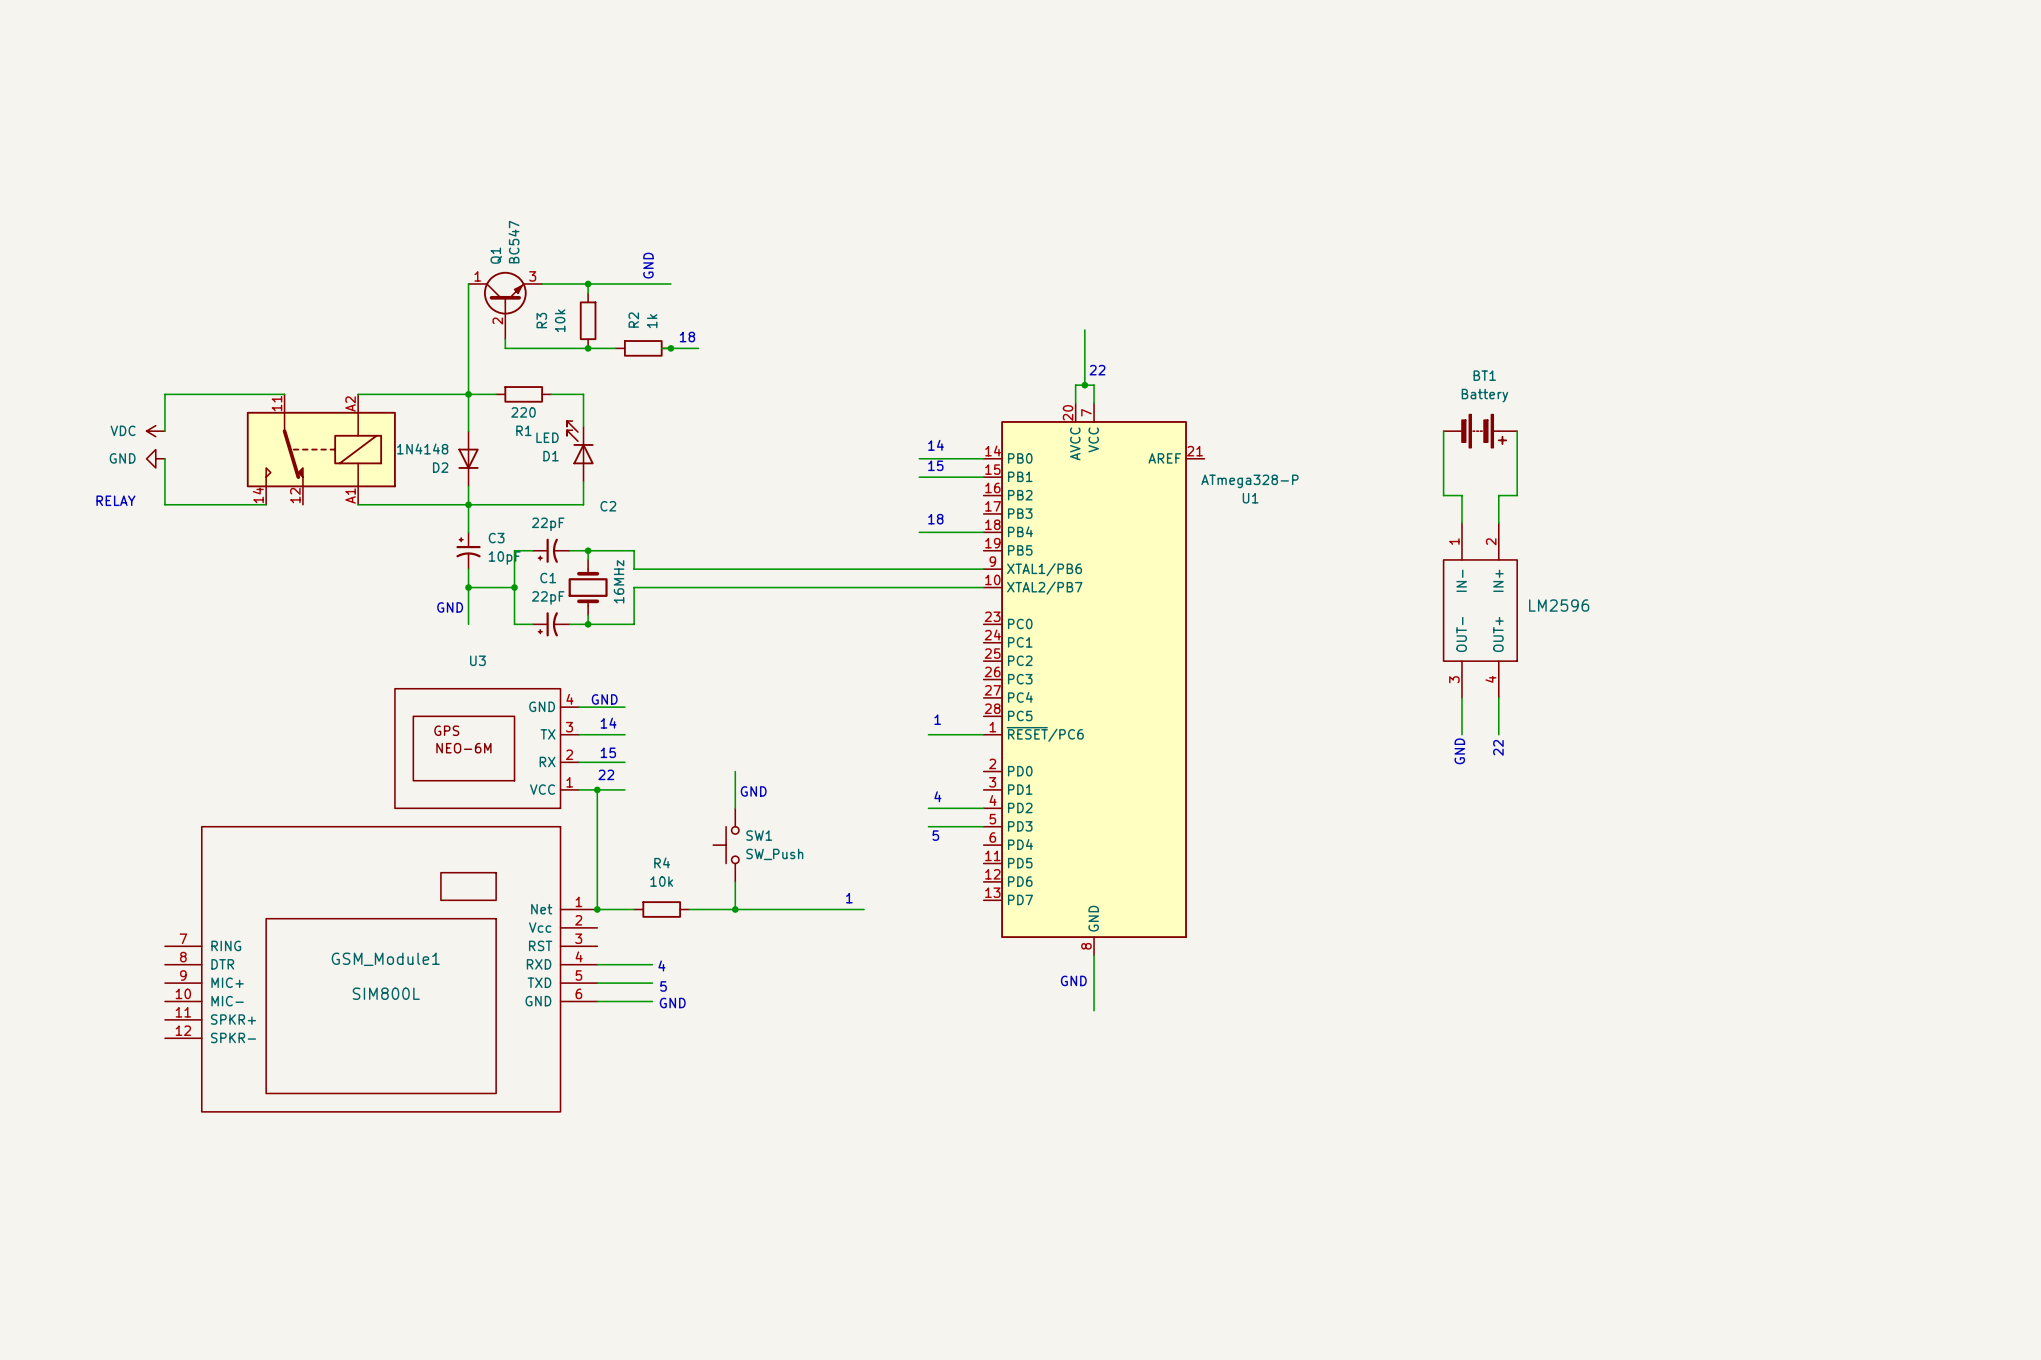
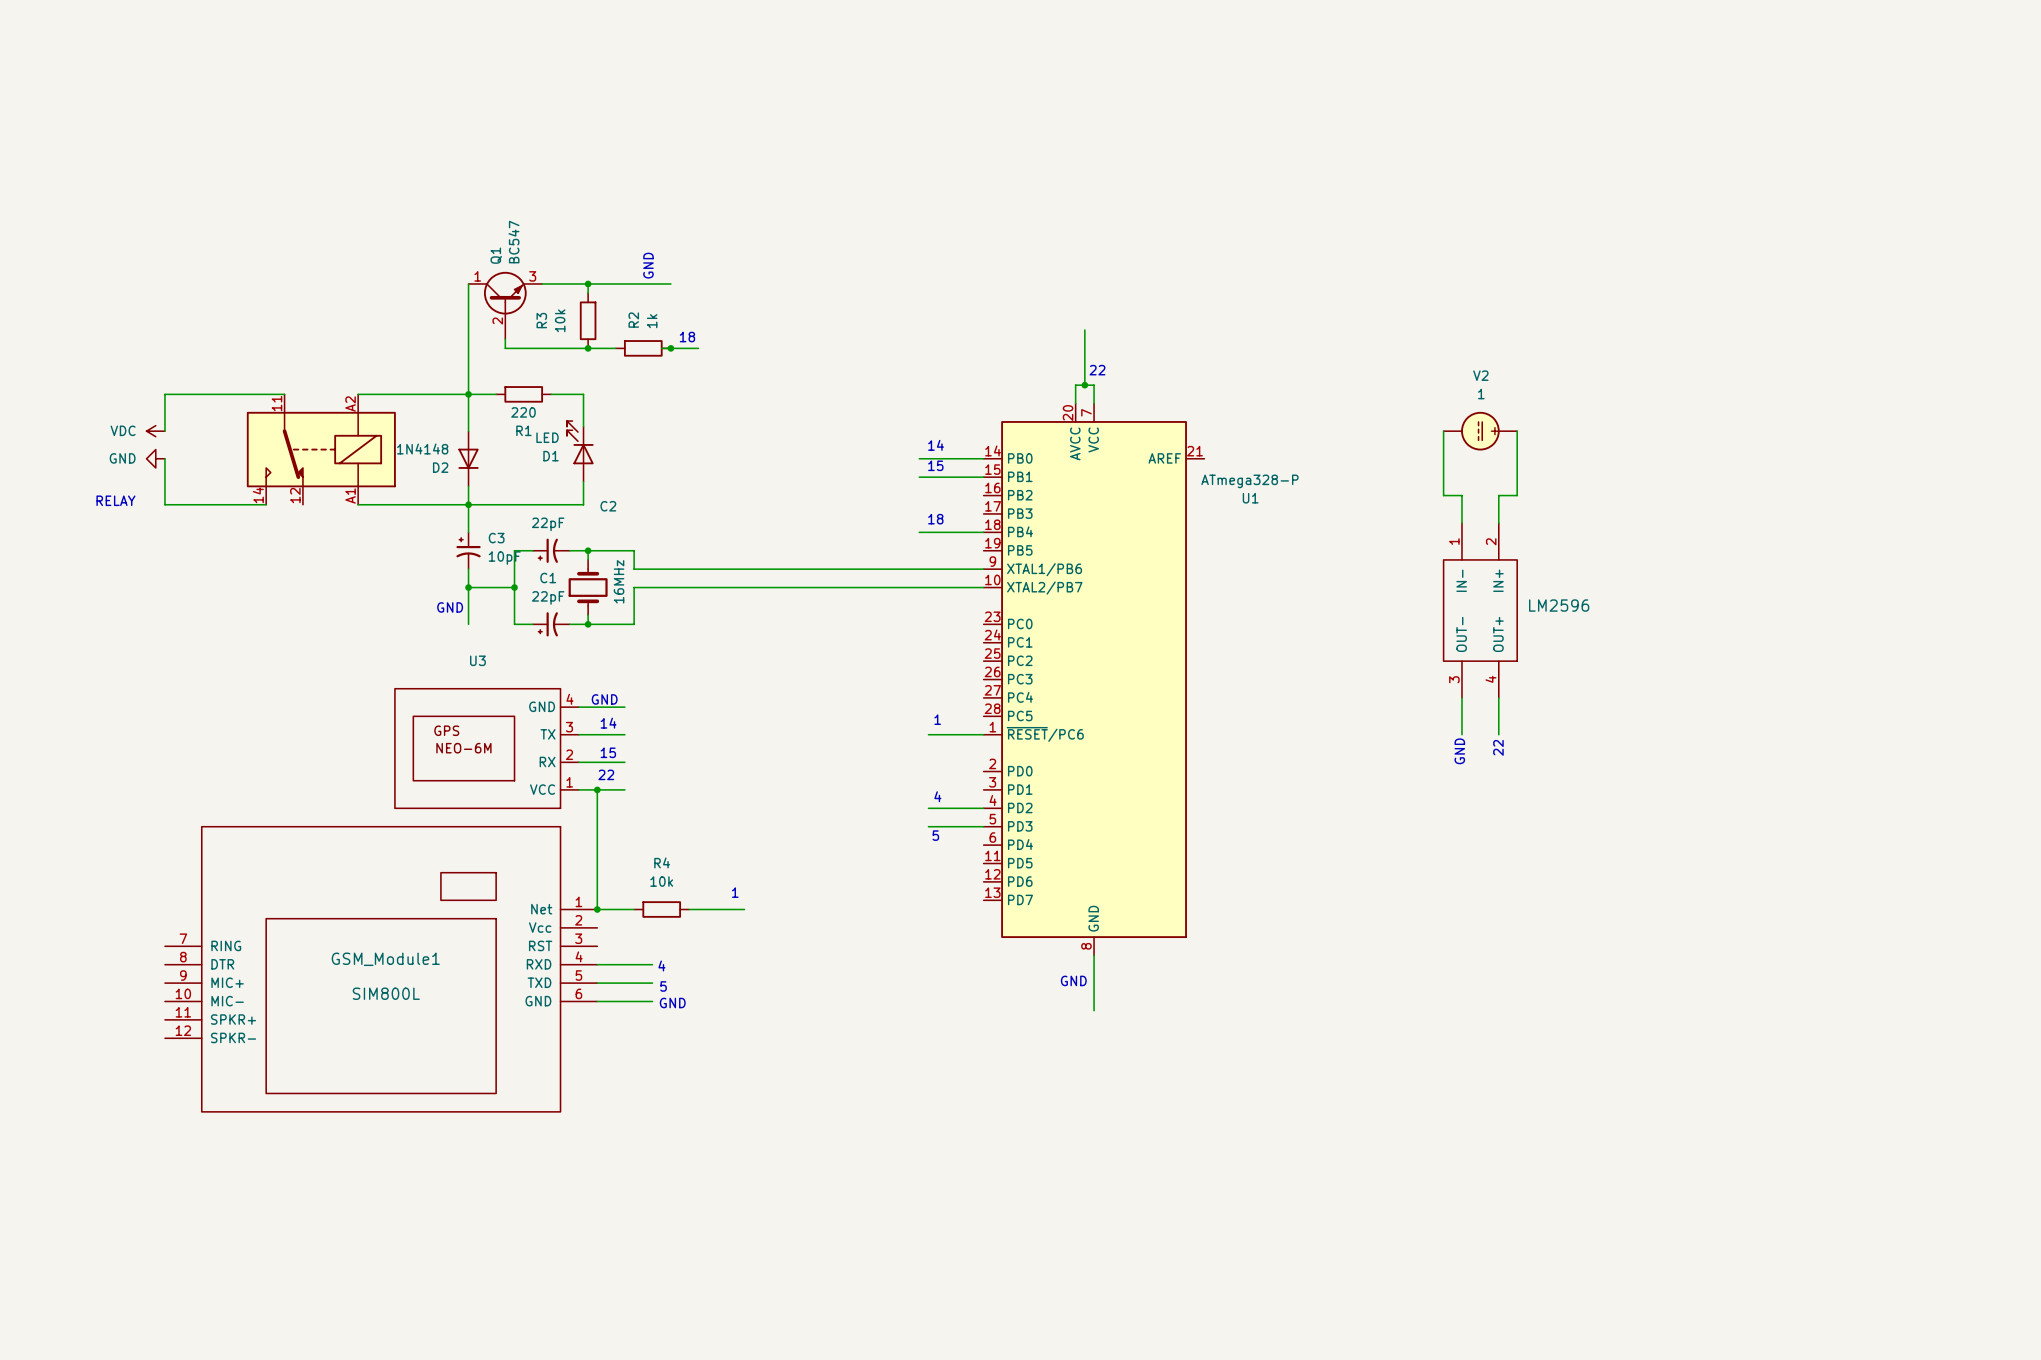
BT1: Battery (1480, 431) -> none
V2: none -> 1 (1480, 431)
wire: (735, 771) (735, 808) -> none
text: GND (753, 791) -> none
SW1: SW_Push (726, 845) -> none
wire: (735, 881) (735, 909) -> none
text position: 1 (849, 898) -> 1 (735, 892)
junction: (735, 909) -> none
wire: (744, 909) (864, 909) -> none

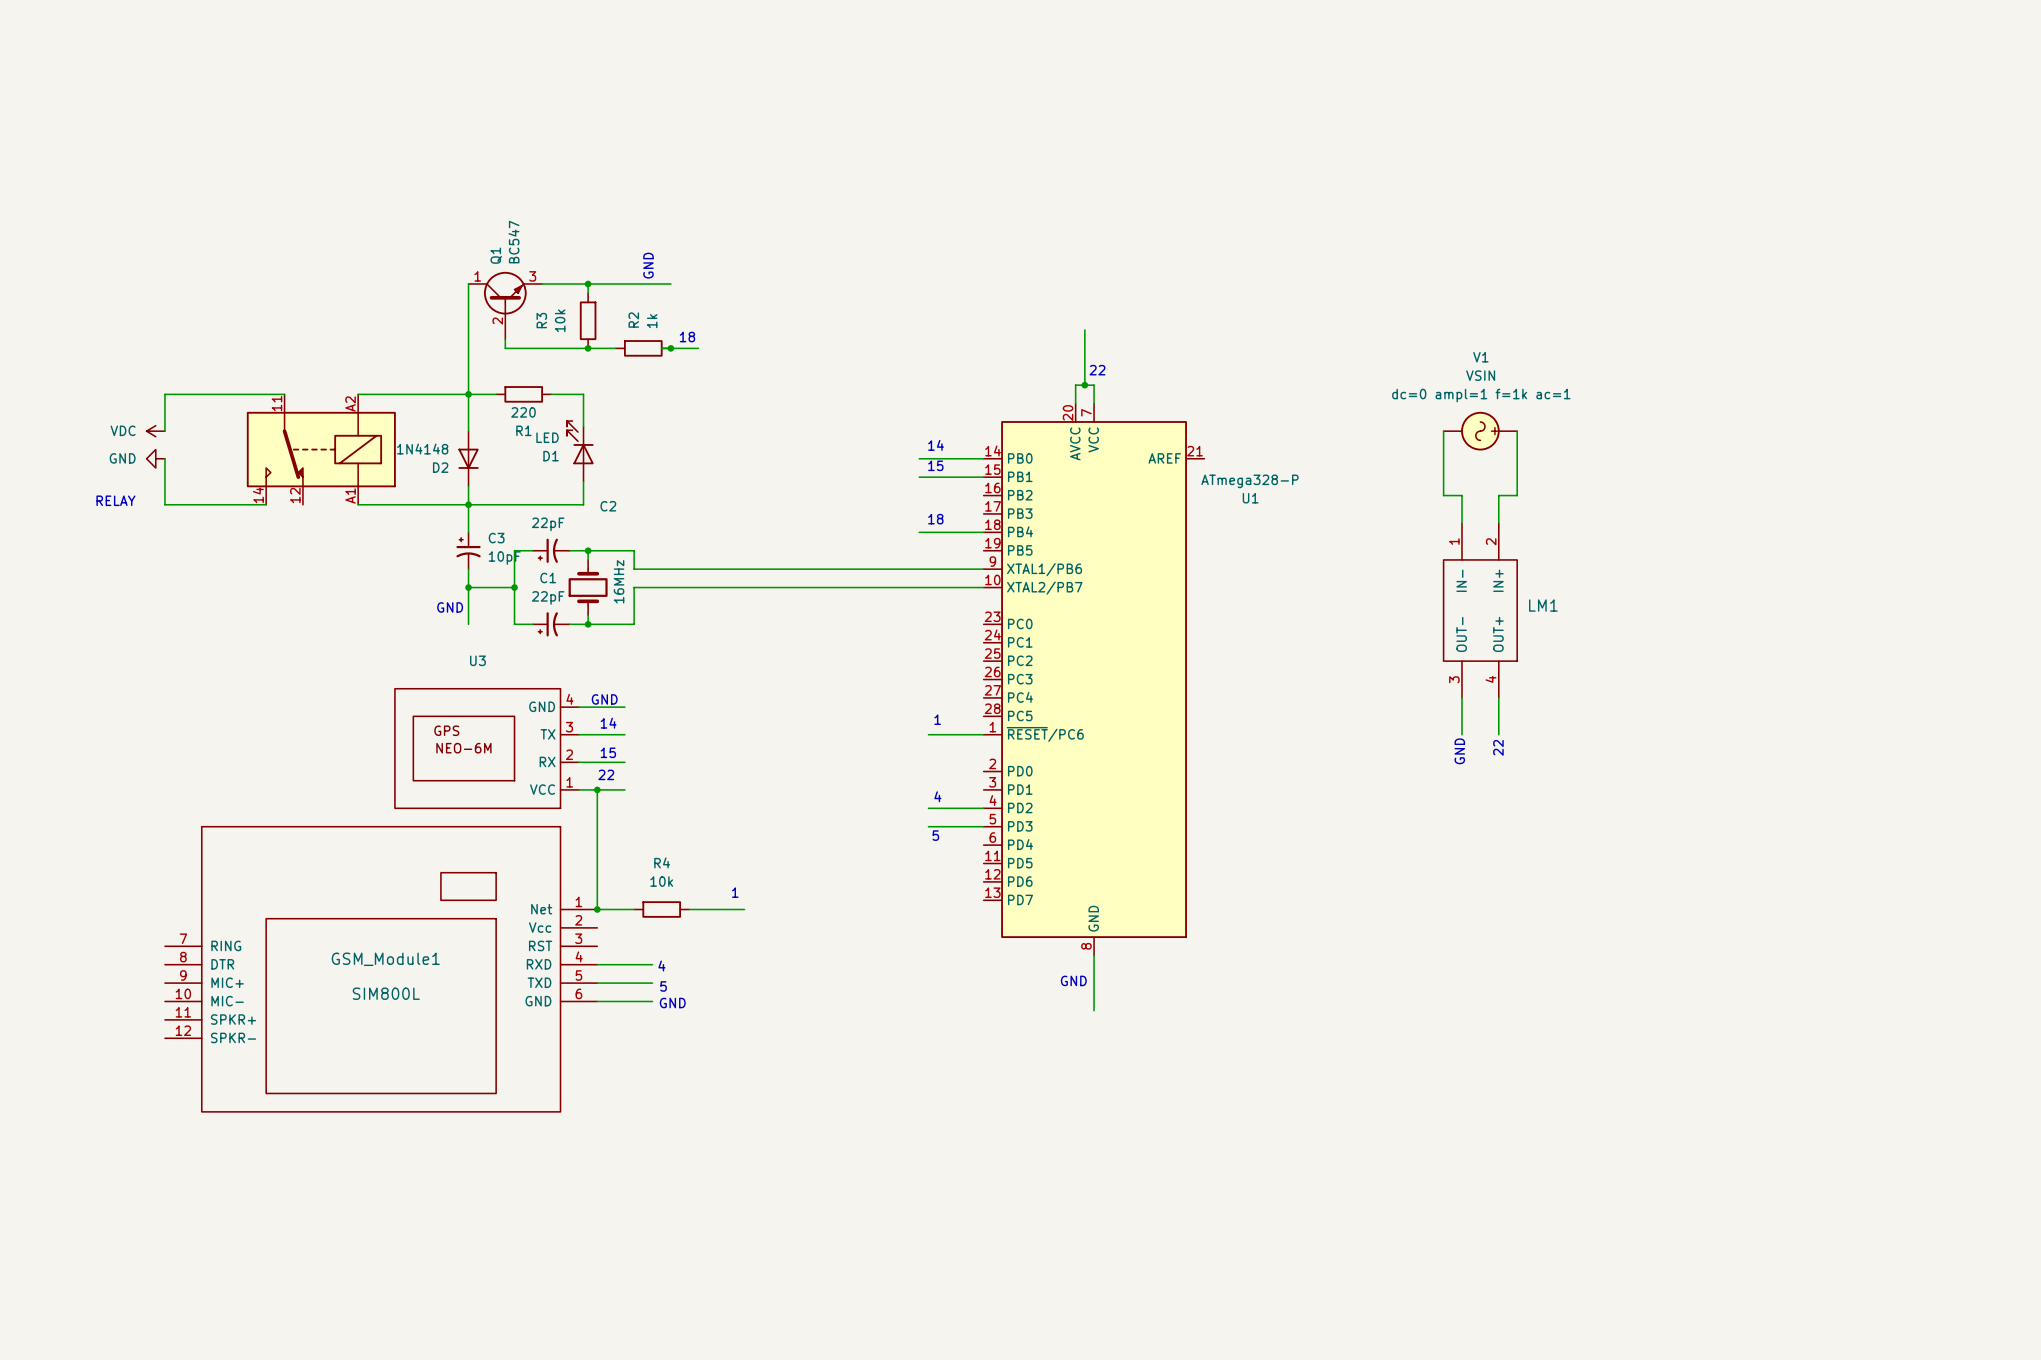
V2: 1 (1480, 431) -> none
V1: none -> VSIN (1480, 431)
LM2596 name: LM2596 (1559, 605) -> LM1 (1543, 605)

